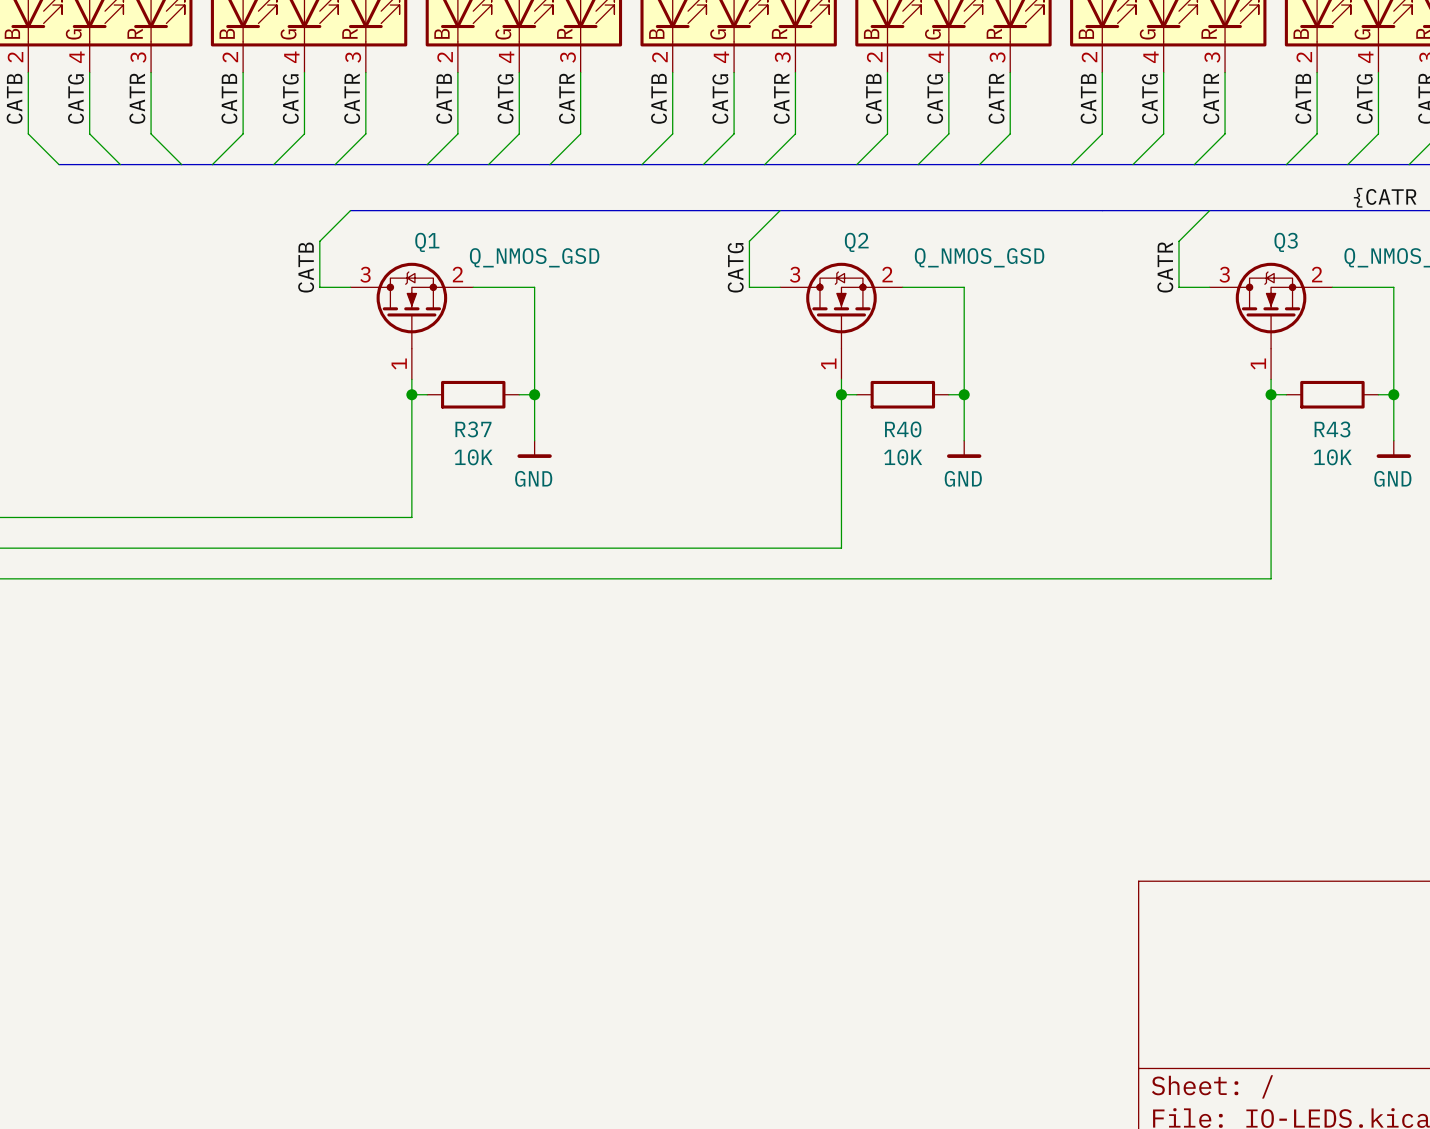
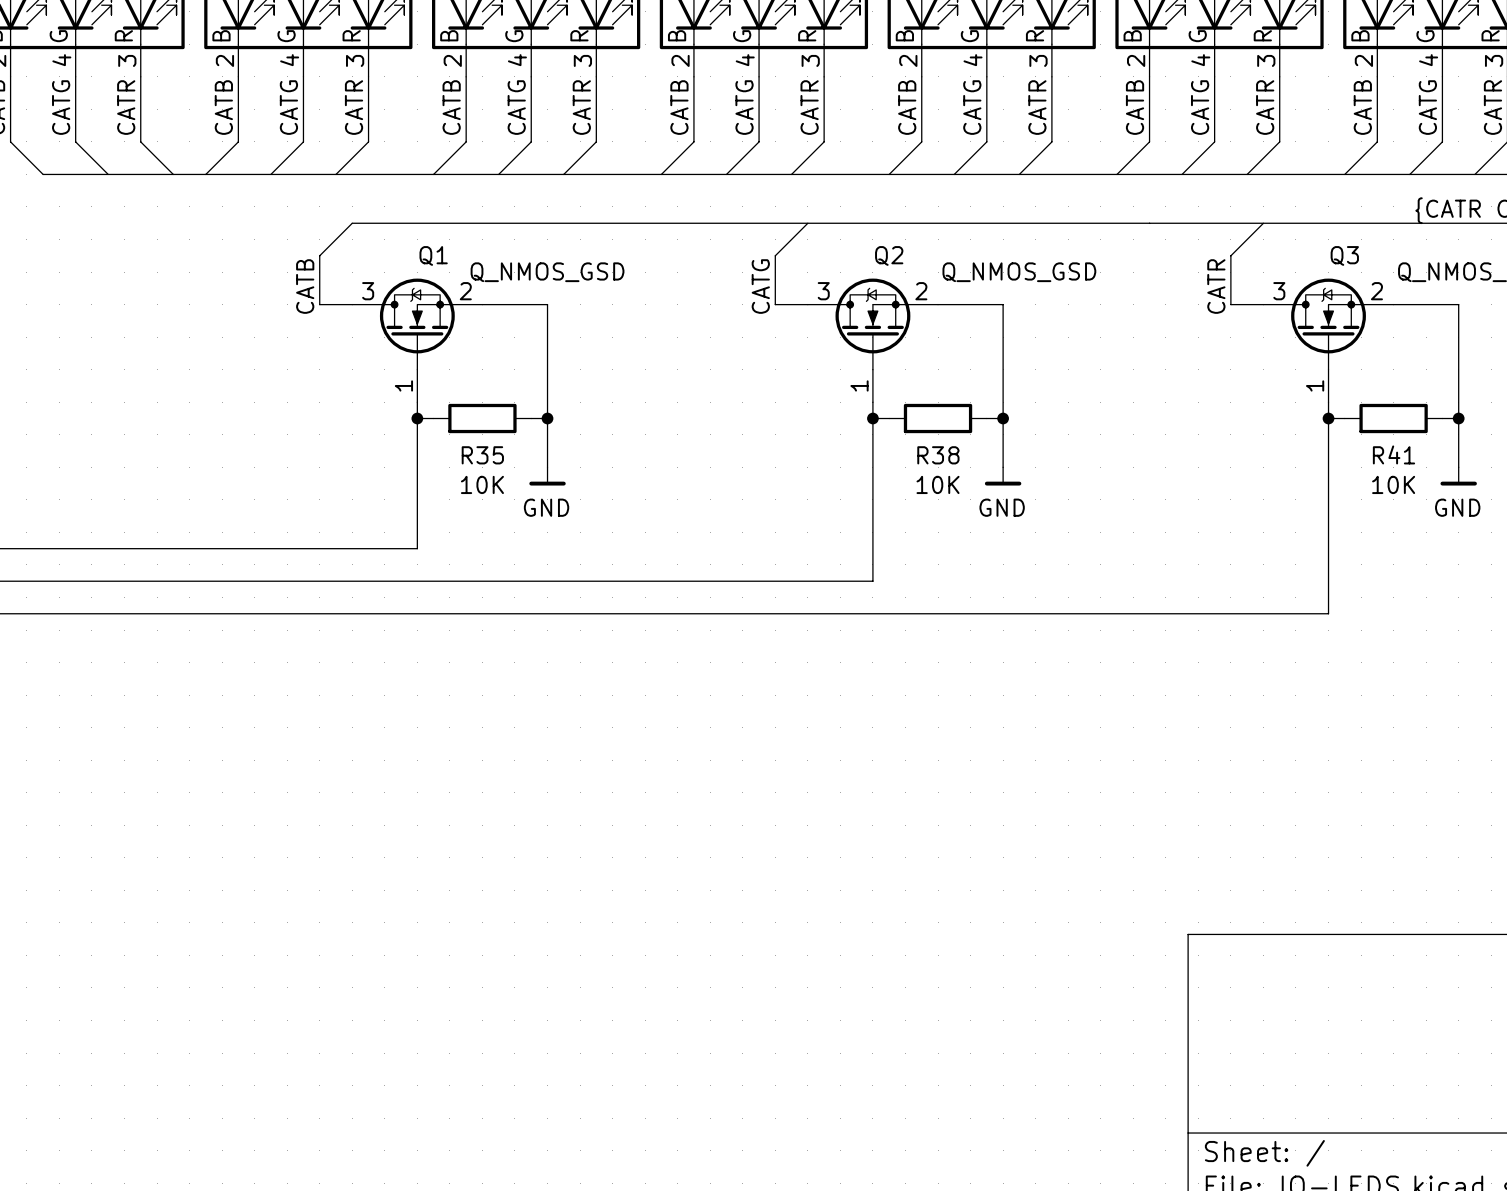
R37 name: R37 (473, 429) -> R35 (482, 455)
R40 name: R40 (903, 429) -> R38 (938, 455)
R43 name: R43 (1332, 429) -> R41 (1393, 454)

